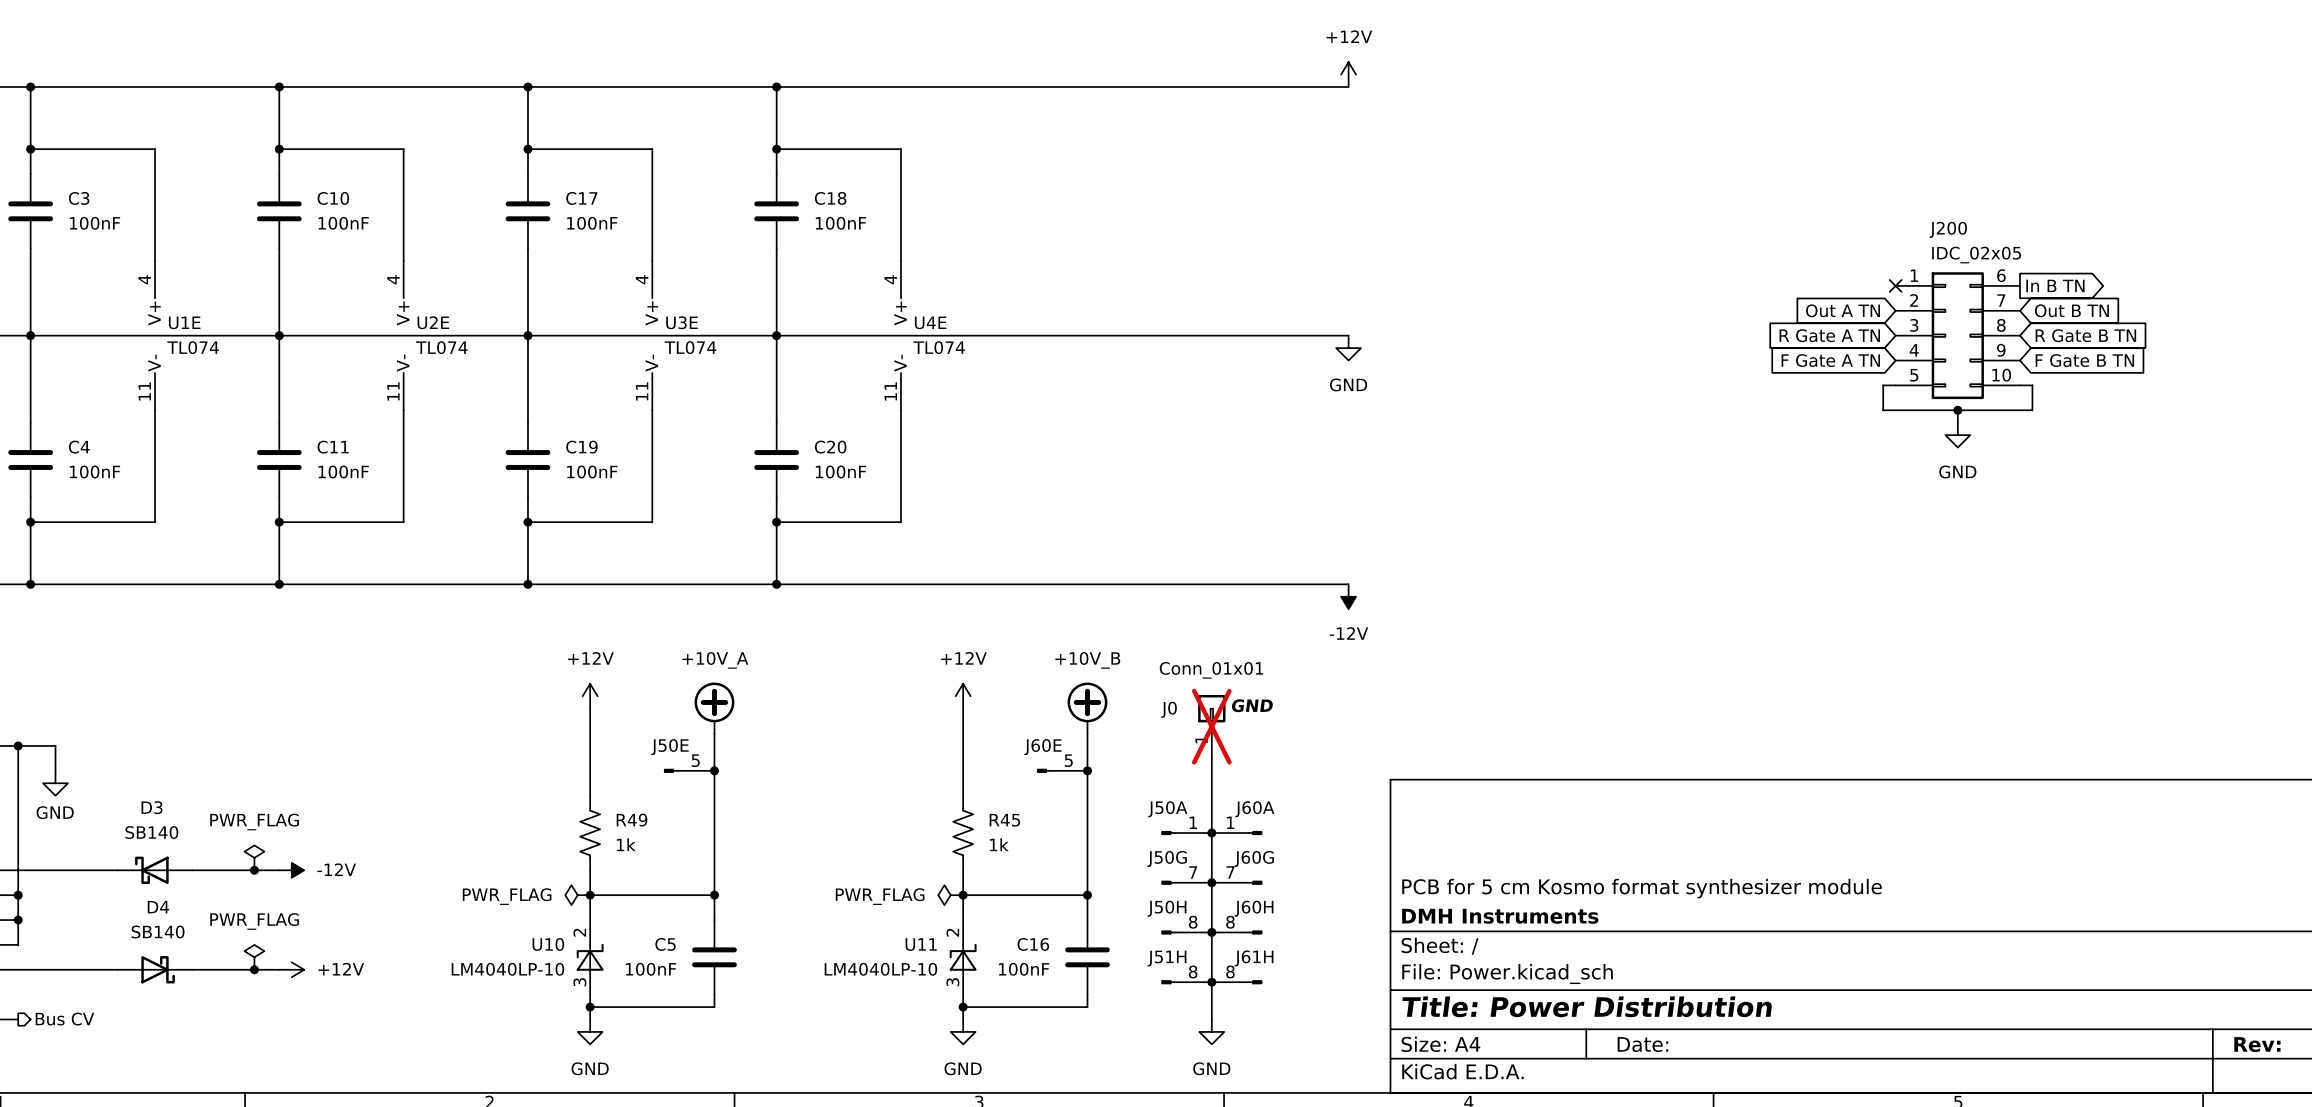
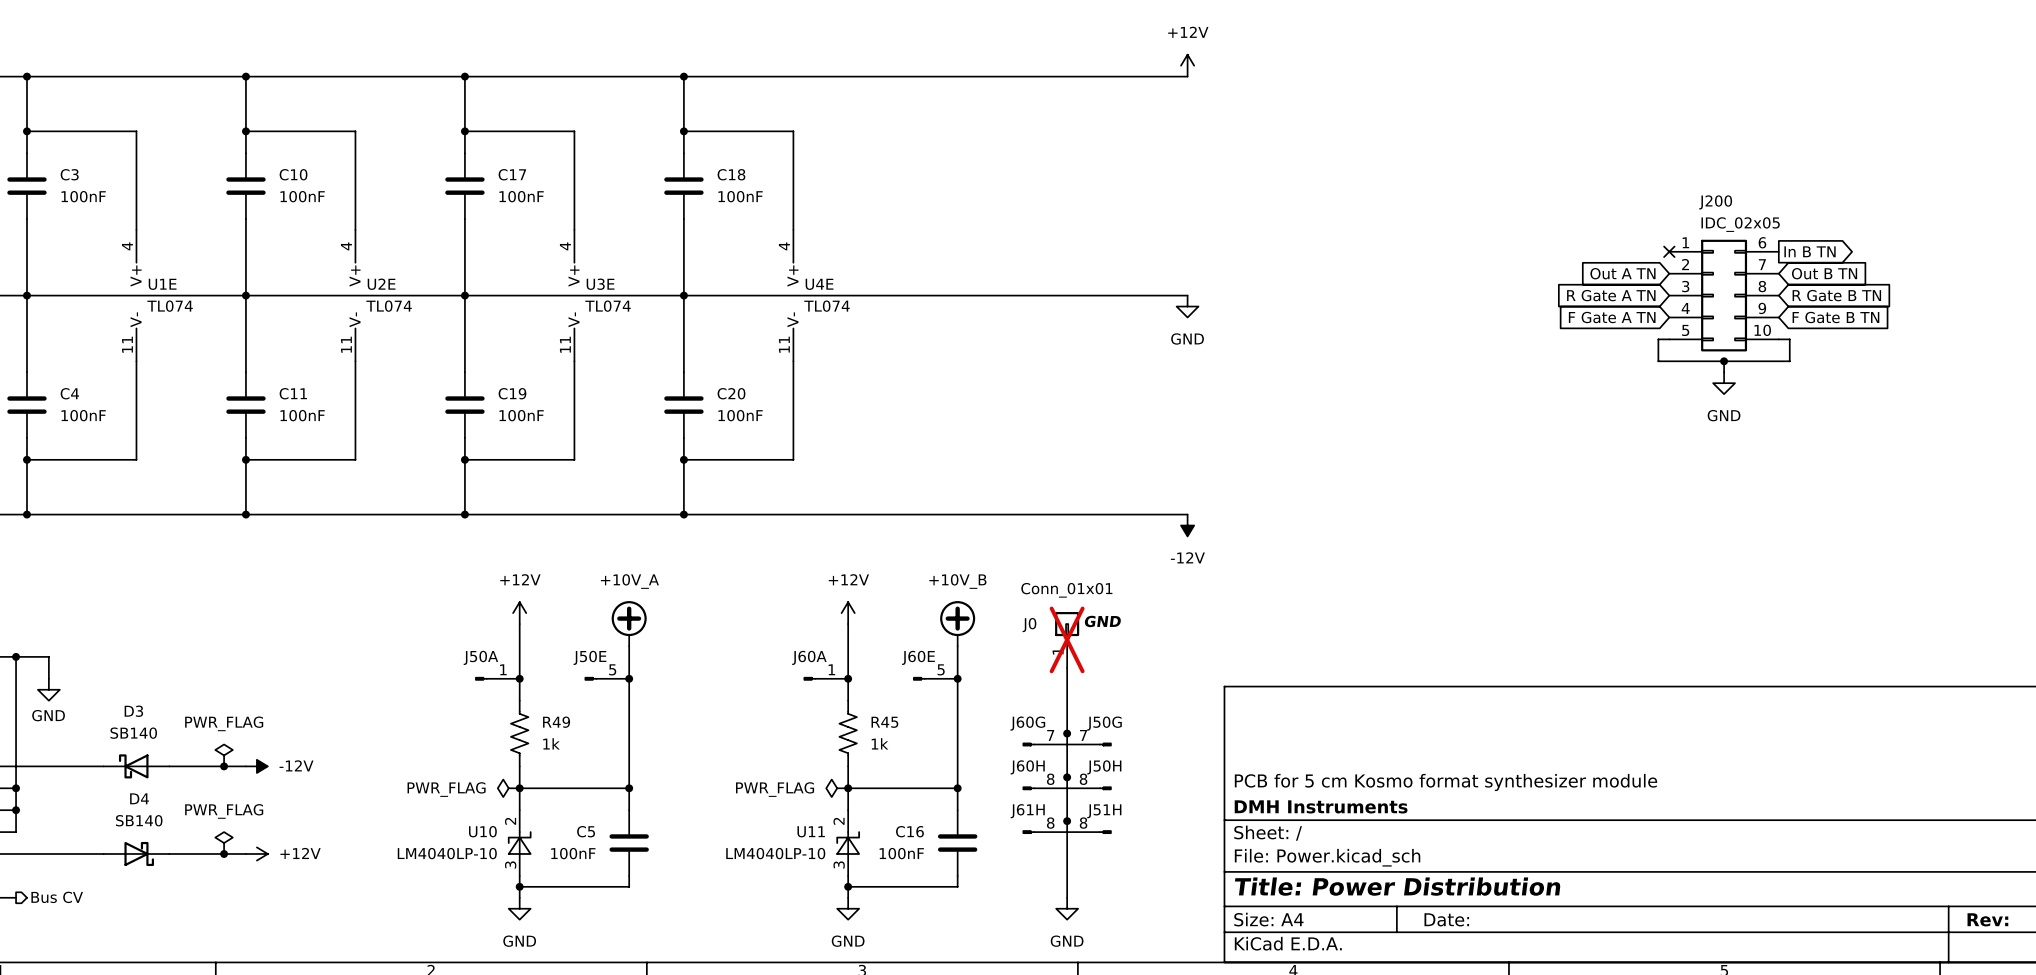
junction: none -> (519, 678)
junction: none -> (848, 678)
J60A name position: J60A (1254, 809) -> J60A (809, 657)
J50A position: (1186, 833) -> (497, 678)
J60A position: (1237, 833) -> (825, 678)
J60A rotation: 0° (1255, 833) -> 180° (809, 678)
J50G name position: J50G (1167, 859) -> J50G (1104, 723)
J60G name position: J60G (1254, 859) -> J60G (1027, 723)
J50G rotation: 0° (1168, 882) -> 180° (1105, 744)
J50G position: (1186, 882) -> (1089, 744)
J60G position: (1237, 882) -> (1044, 744)
J60G rotation: 0° (1255, 882) -> 180° (1028, 744)
J50H name position: J50H (1167, 908) -> J50H (1104, 767)
J60H name position: J60H (1254, 908) -> J60H (1027, 767)
J50H rotation: 0° (1168, 932) -> 180° (1105, 788)
J50H position: (1186, 932) -> (1089, 788)
J60H position: (1237, 932) -> (1044, 788)
J60H rotation: 0° (1255, 932) -> 180° (1028, 788)
J51H name position: J51H (1167, 958) -> J51H (1104, 811)
J61H name position: J61H (1254, 958) -> J61H (1027, 811)
J51H rotation: 0° (1168, 982) -> 180° (1105, 832)
J51H position: (1186, 982) -> (1089, 832)
junction: (1211, 982) -> none
J61H position: (1237, 982) -> (1044, 832)
J61H rotation: 0° (1255, 982) -> 180° (1028, 832)

